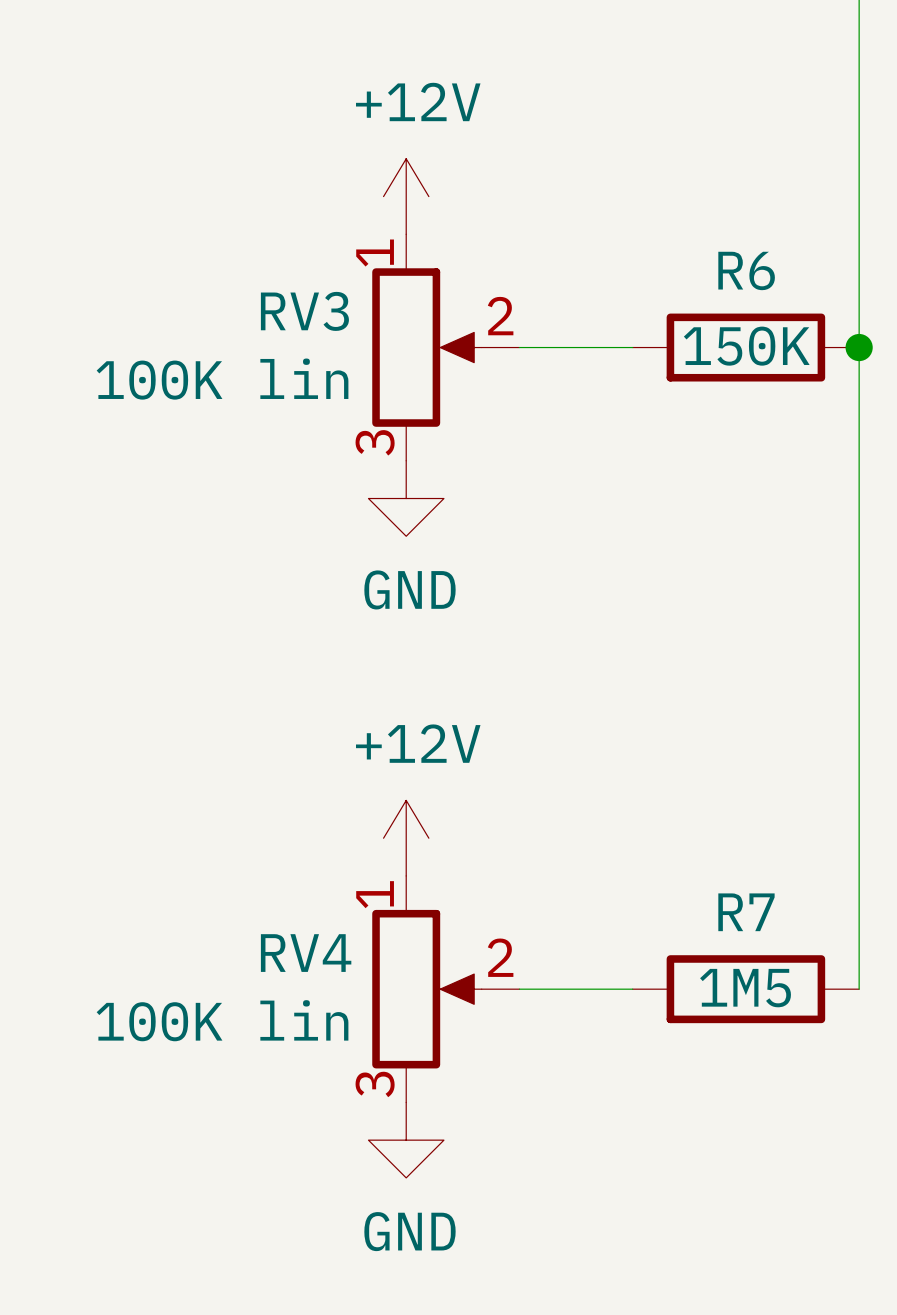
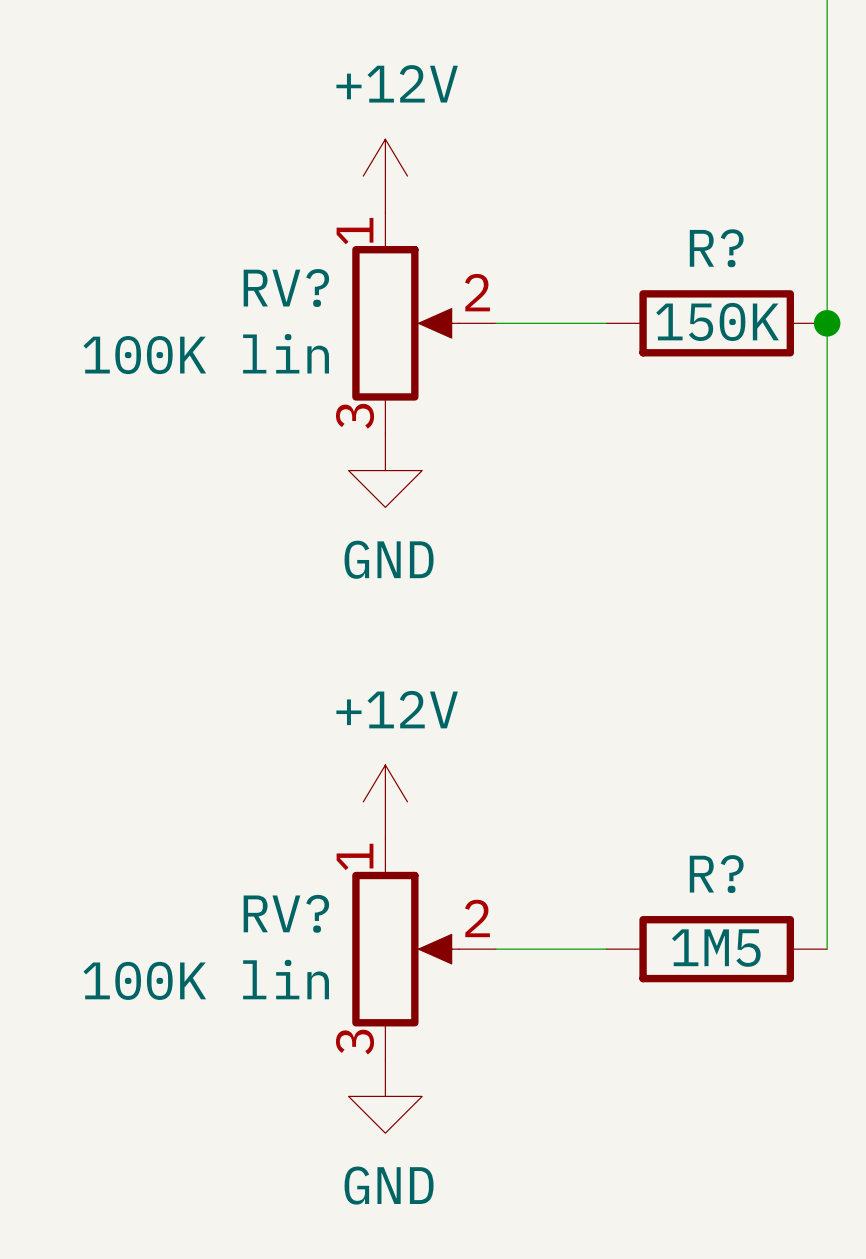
R6 name: R6 (746, 270) -> R? (716, 248)
RV3 name: RV3 (304, 311) -> RV? (286, 288)
R7 name: R7 (746, 912) -> R? (716, 874)
RV4 name: RV4 (306, 953) -> RV? (286, 913)

